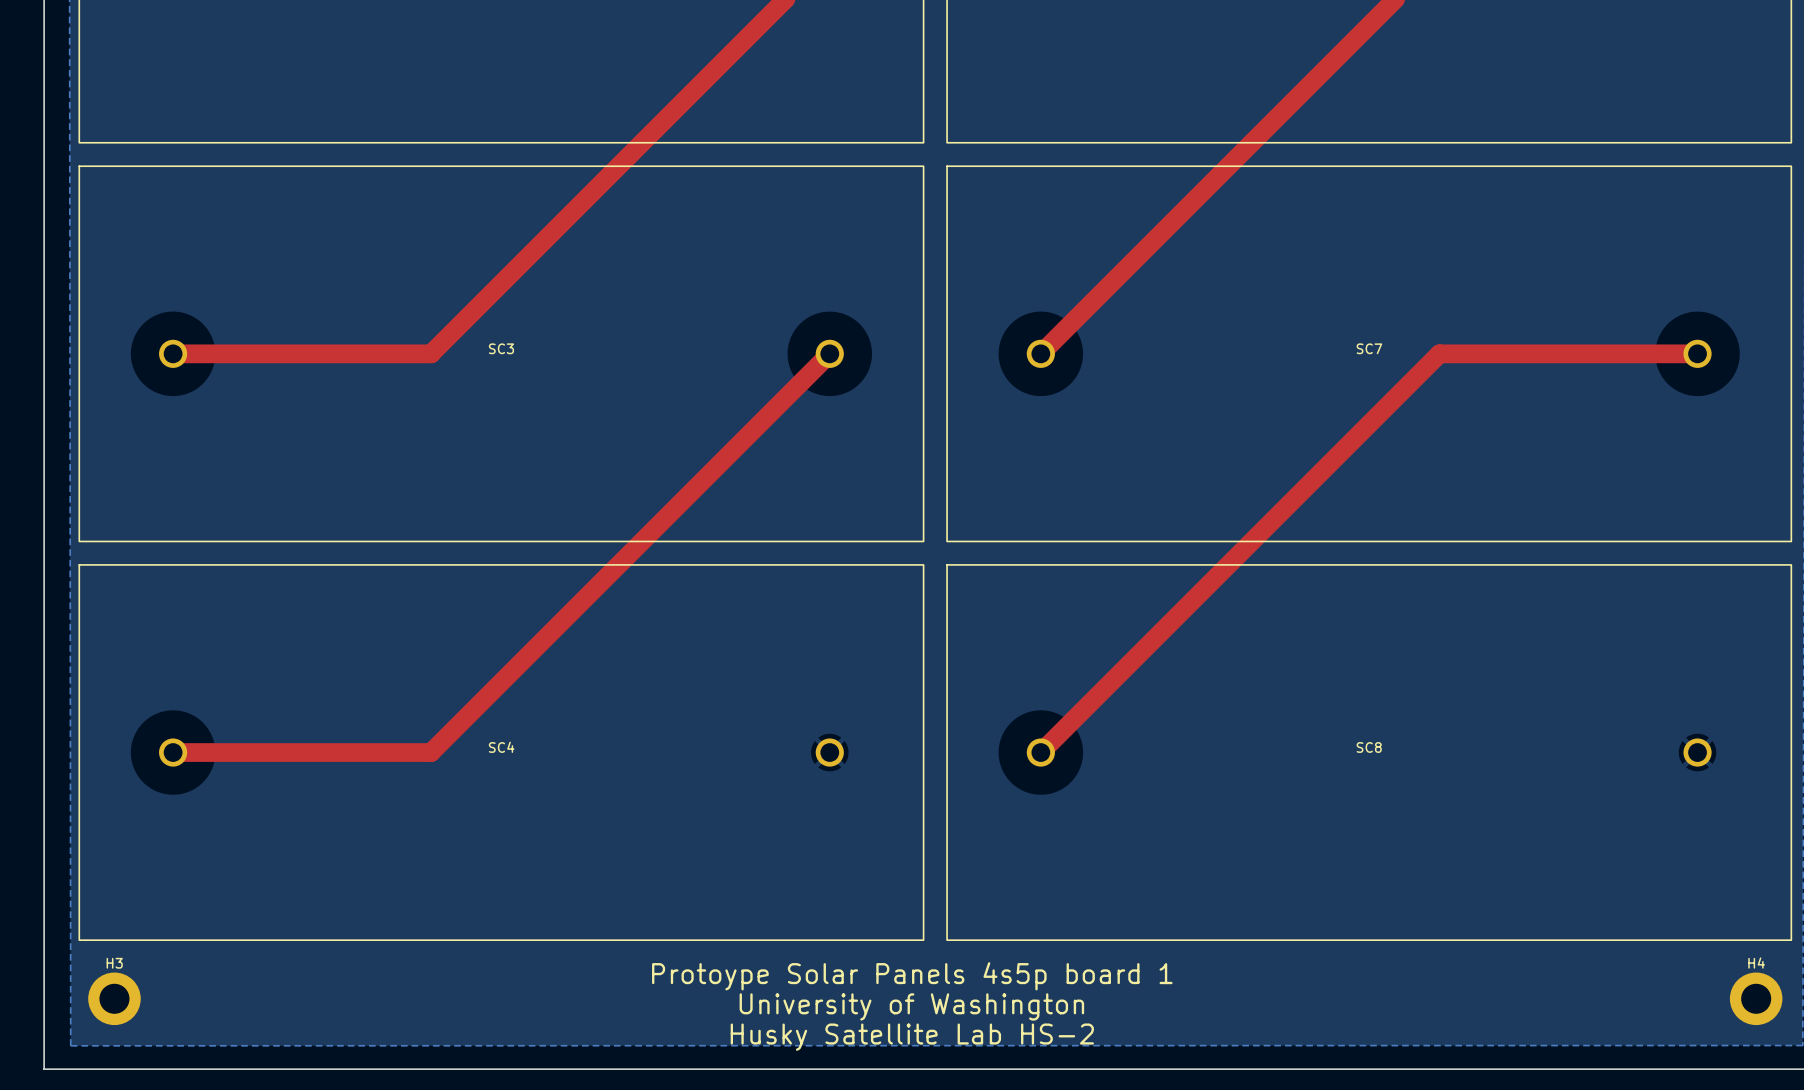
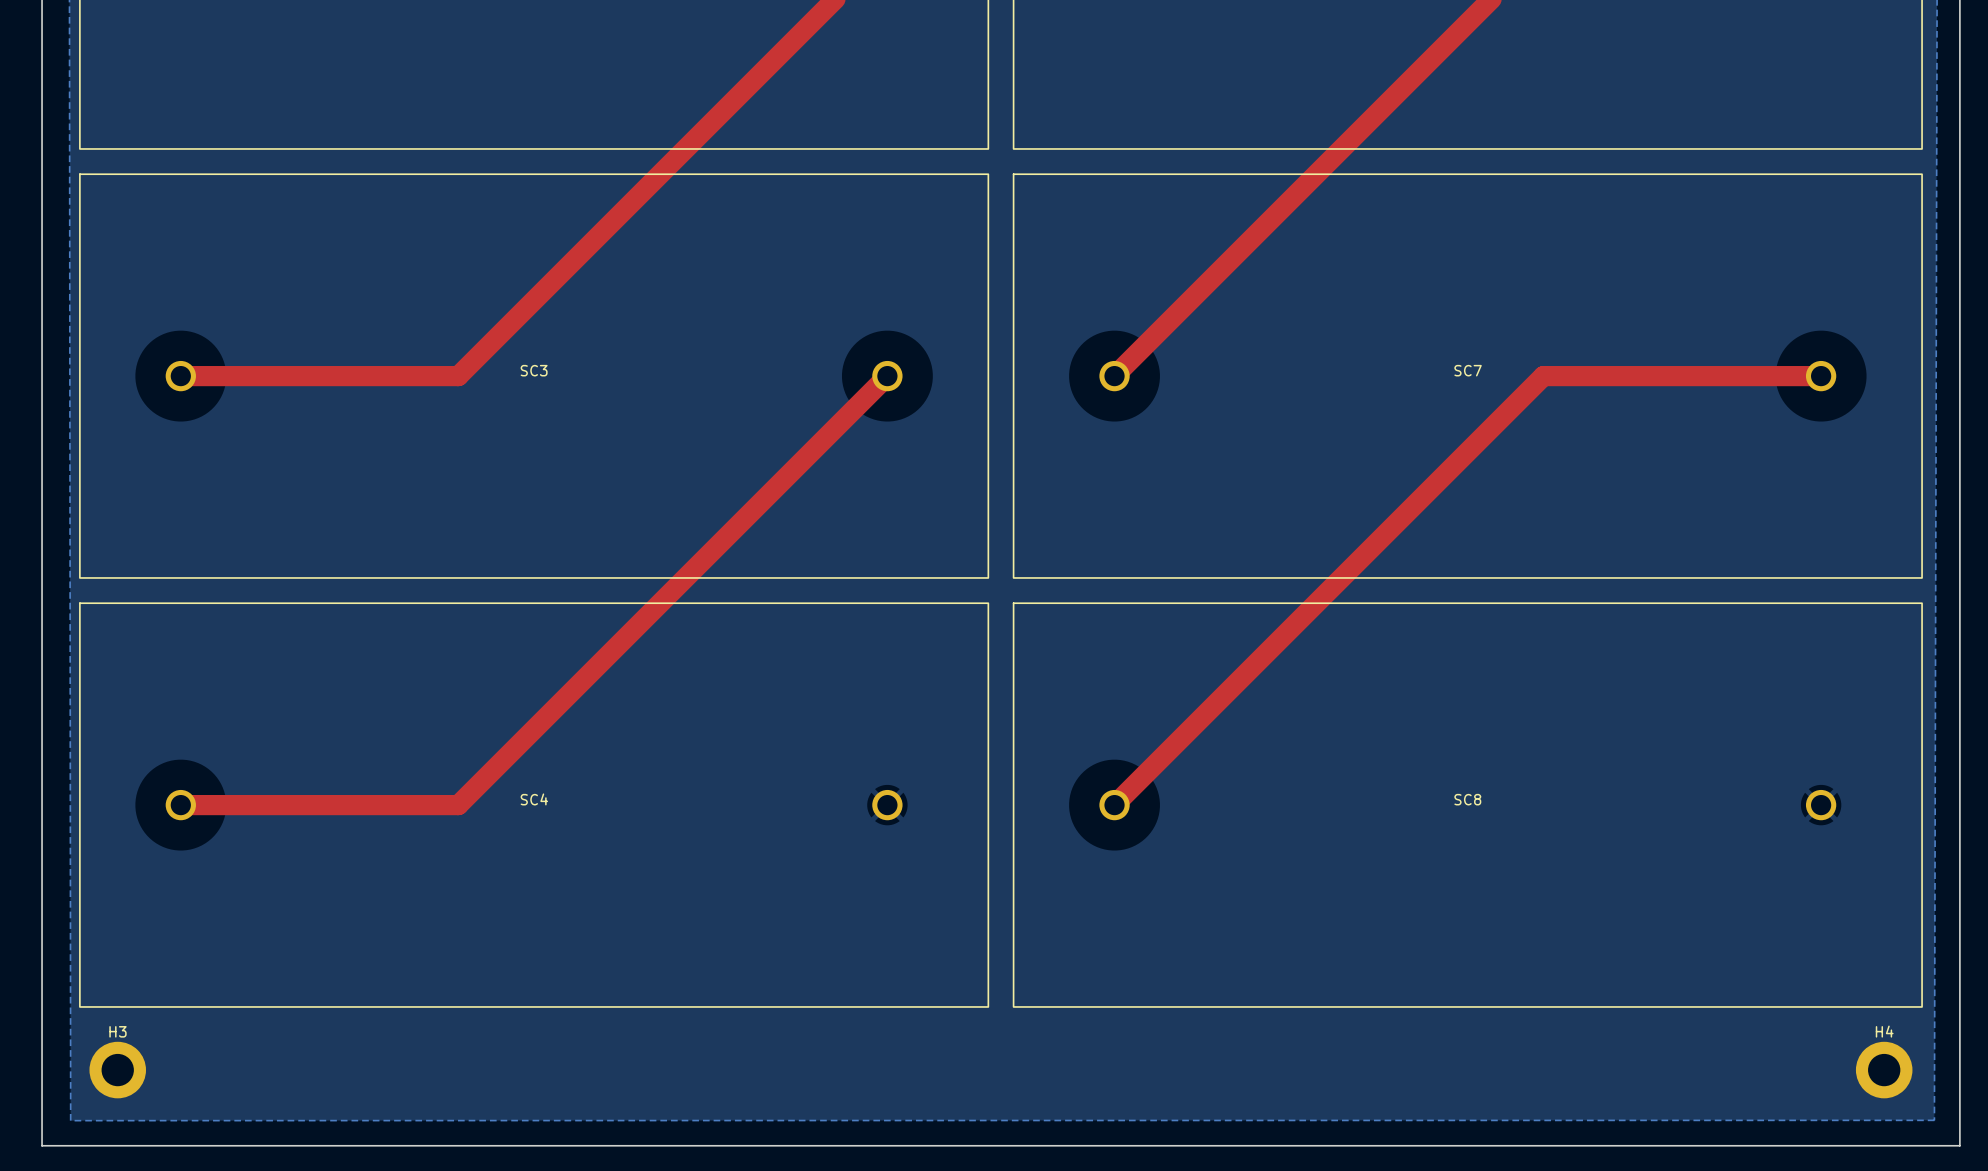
text: Protoype Solar Panels 4s5p board 1 (912, 976) -> none
text: University of Washington (911, 1006) -> none
text: Husky Satellite Lab HS-2 (912, 1037) -> none

